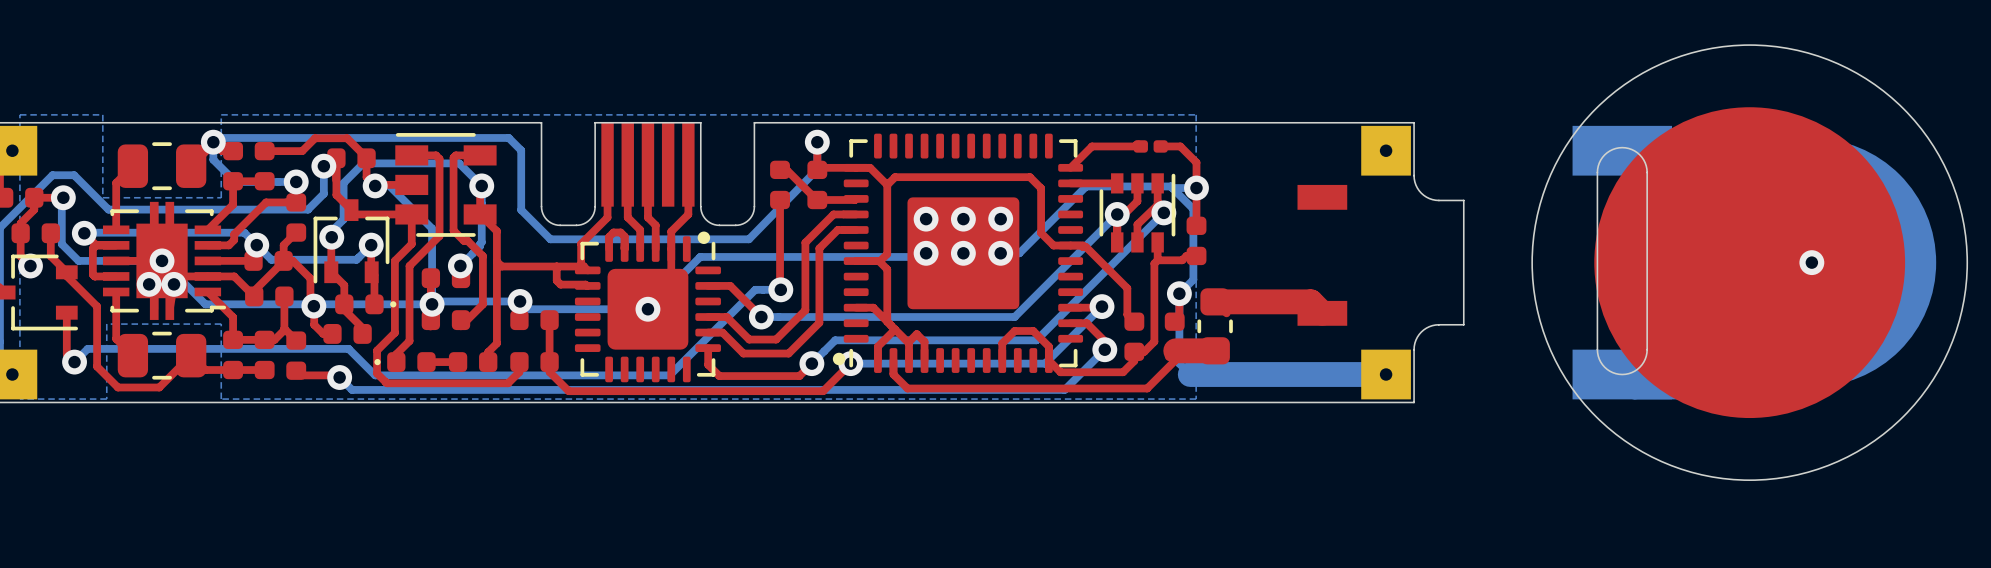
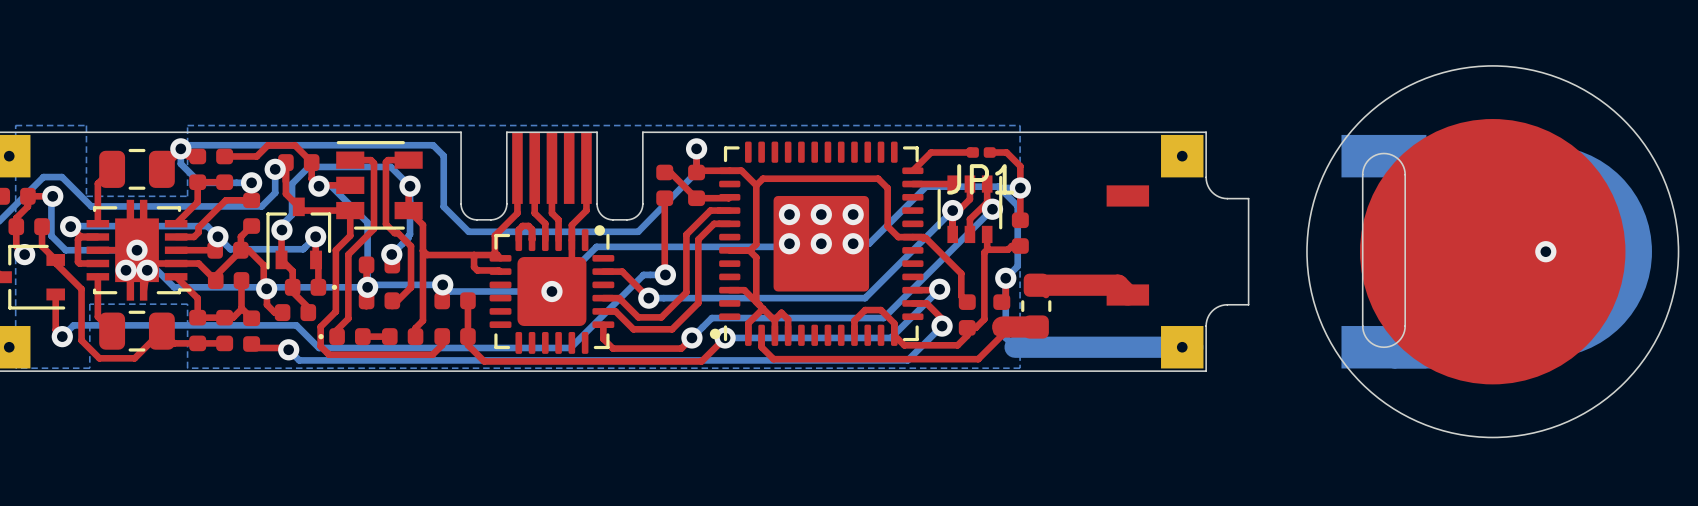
JP1 name: none -> JP1 (980, 179)

